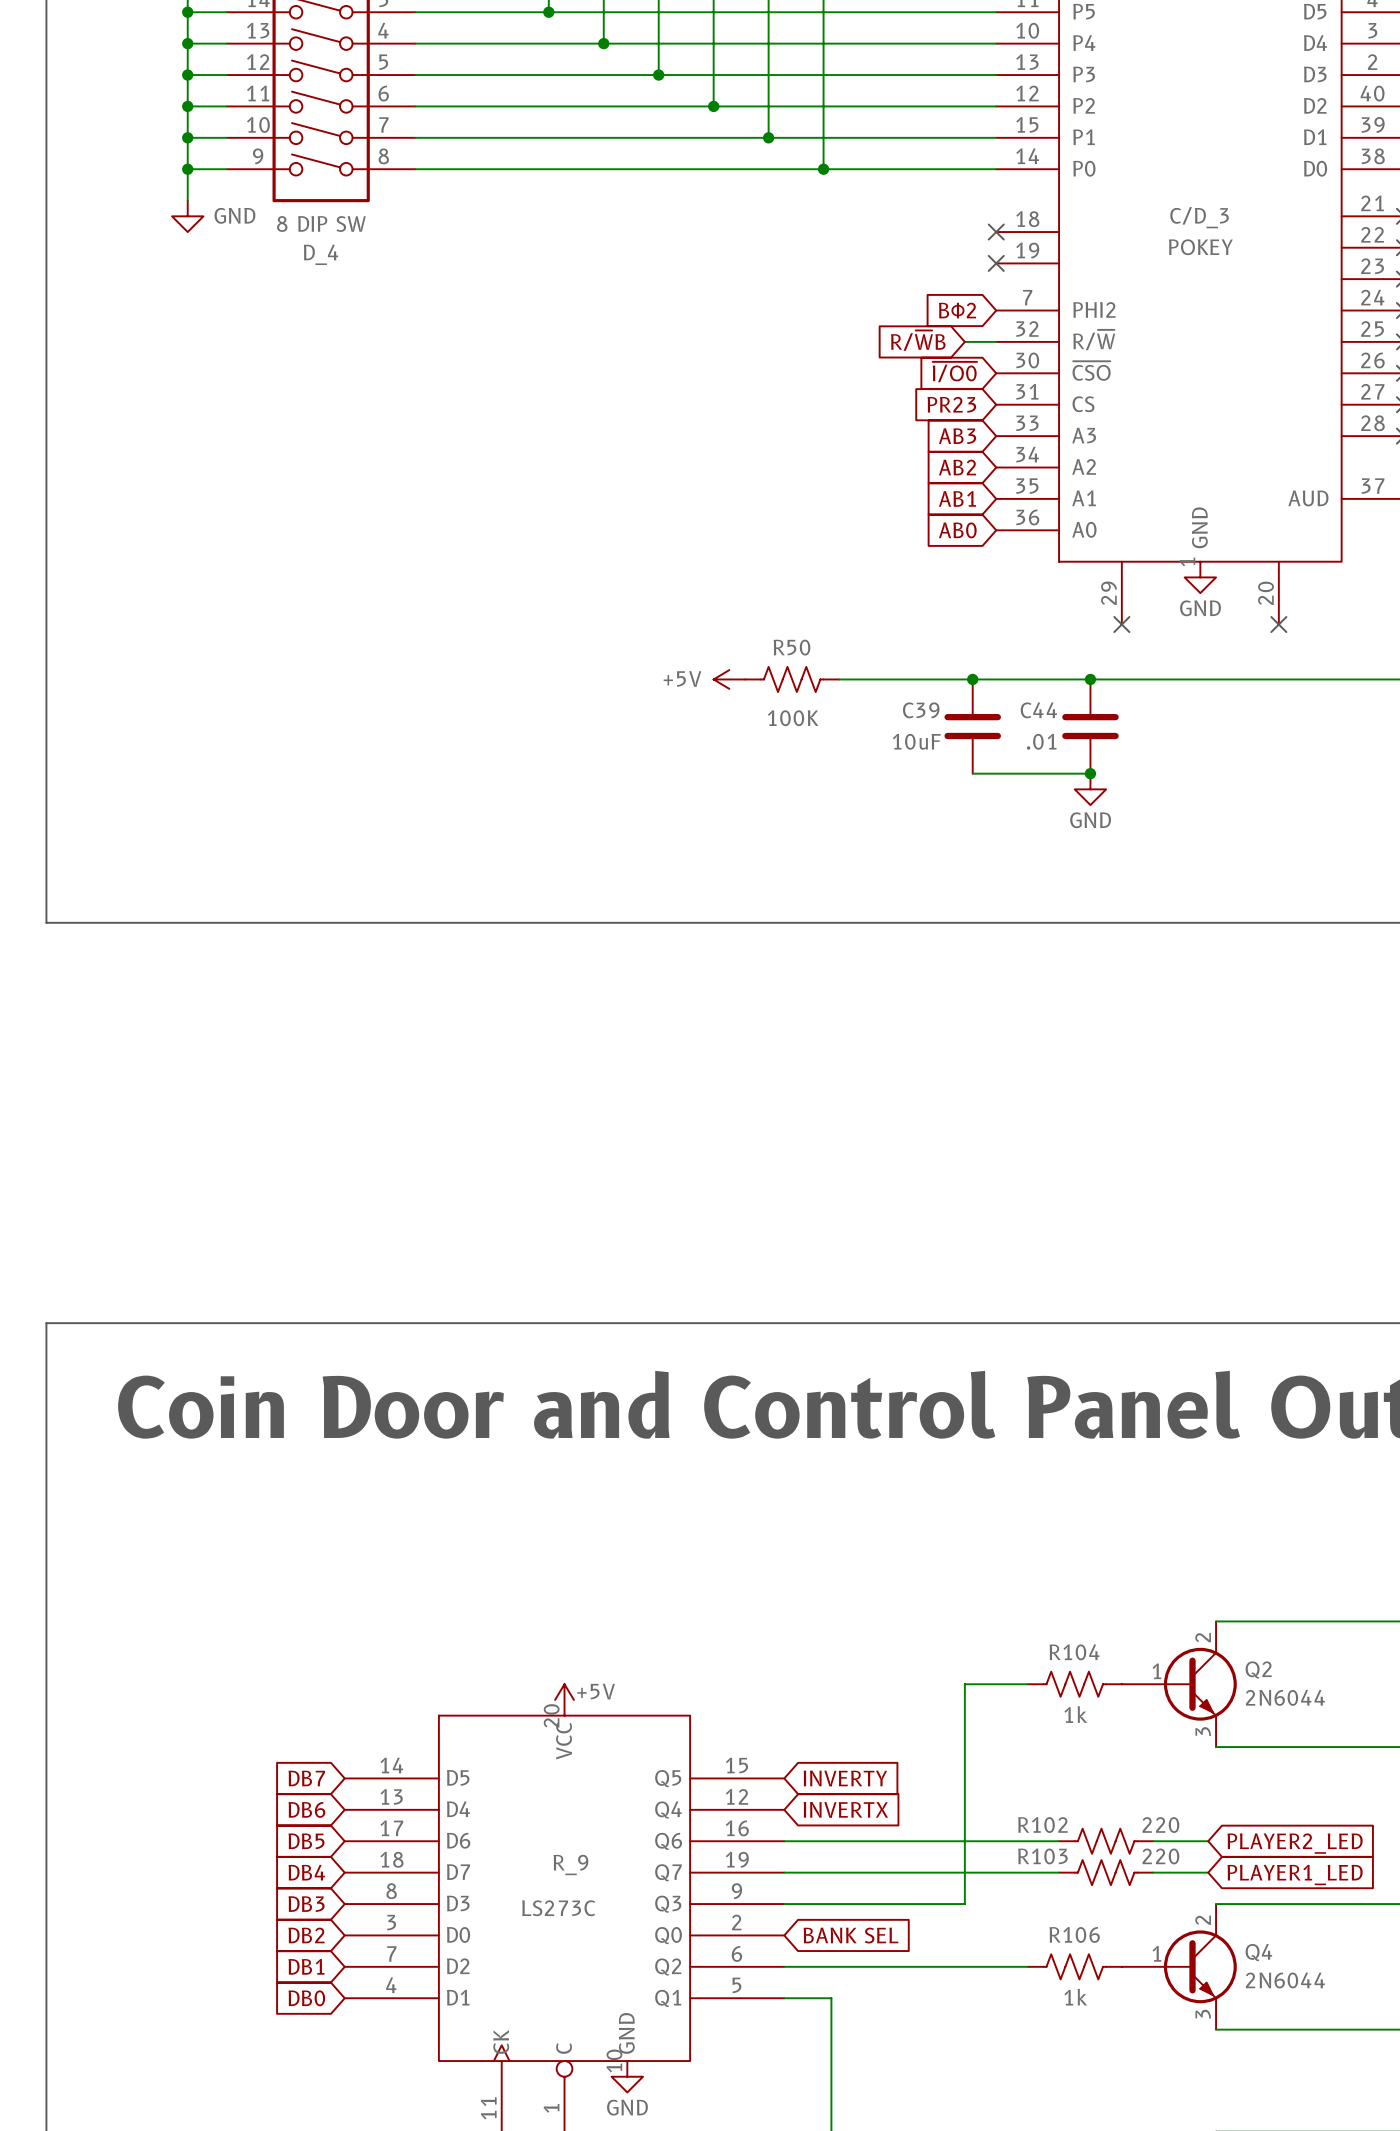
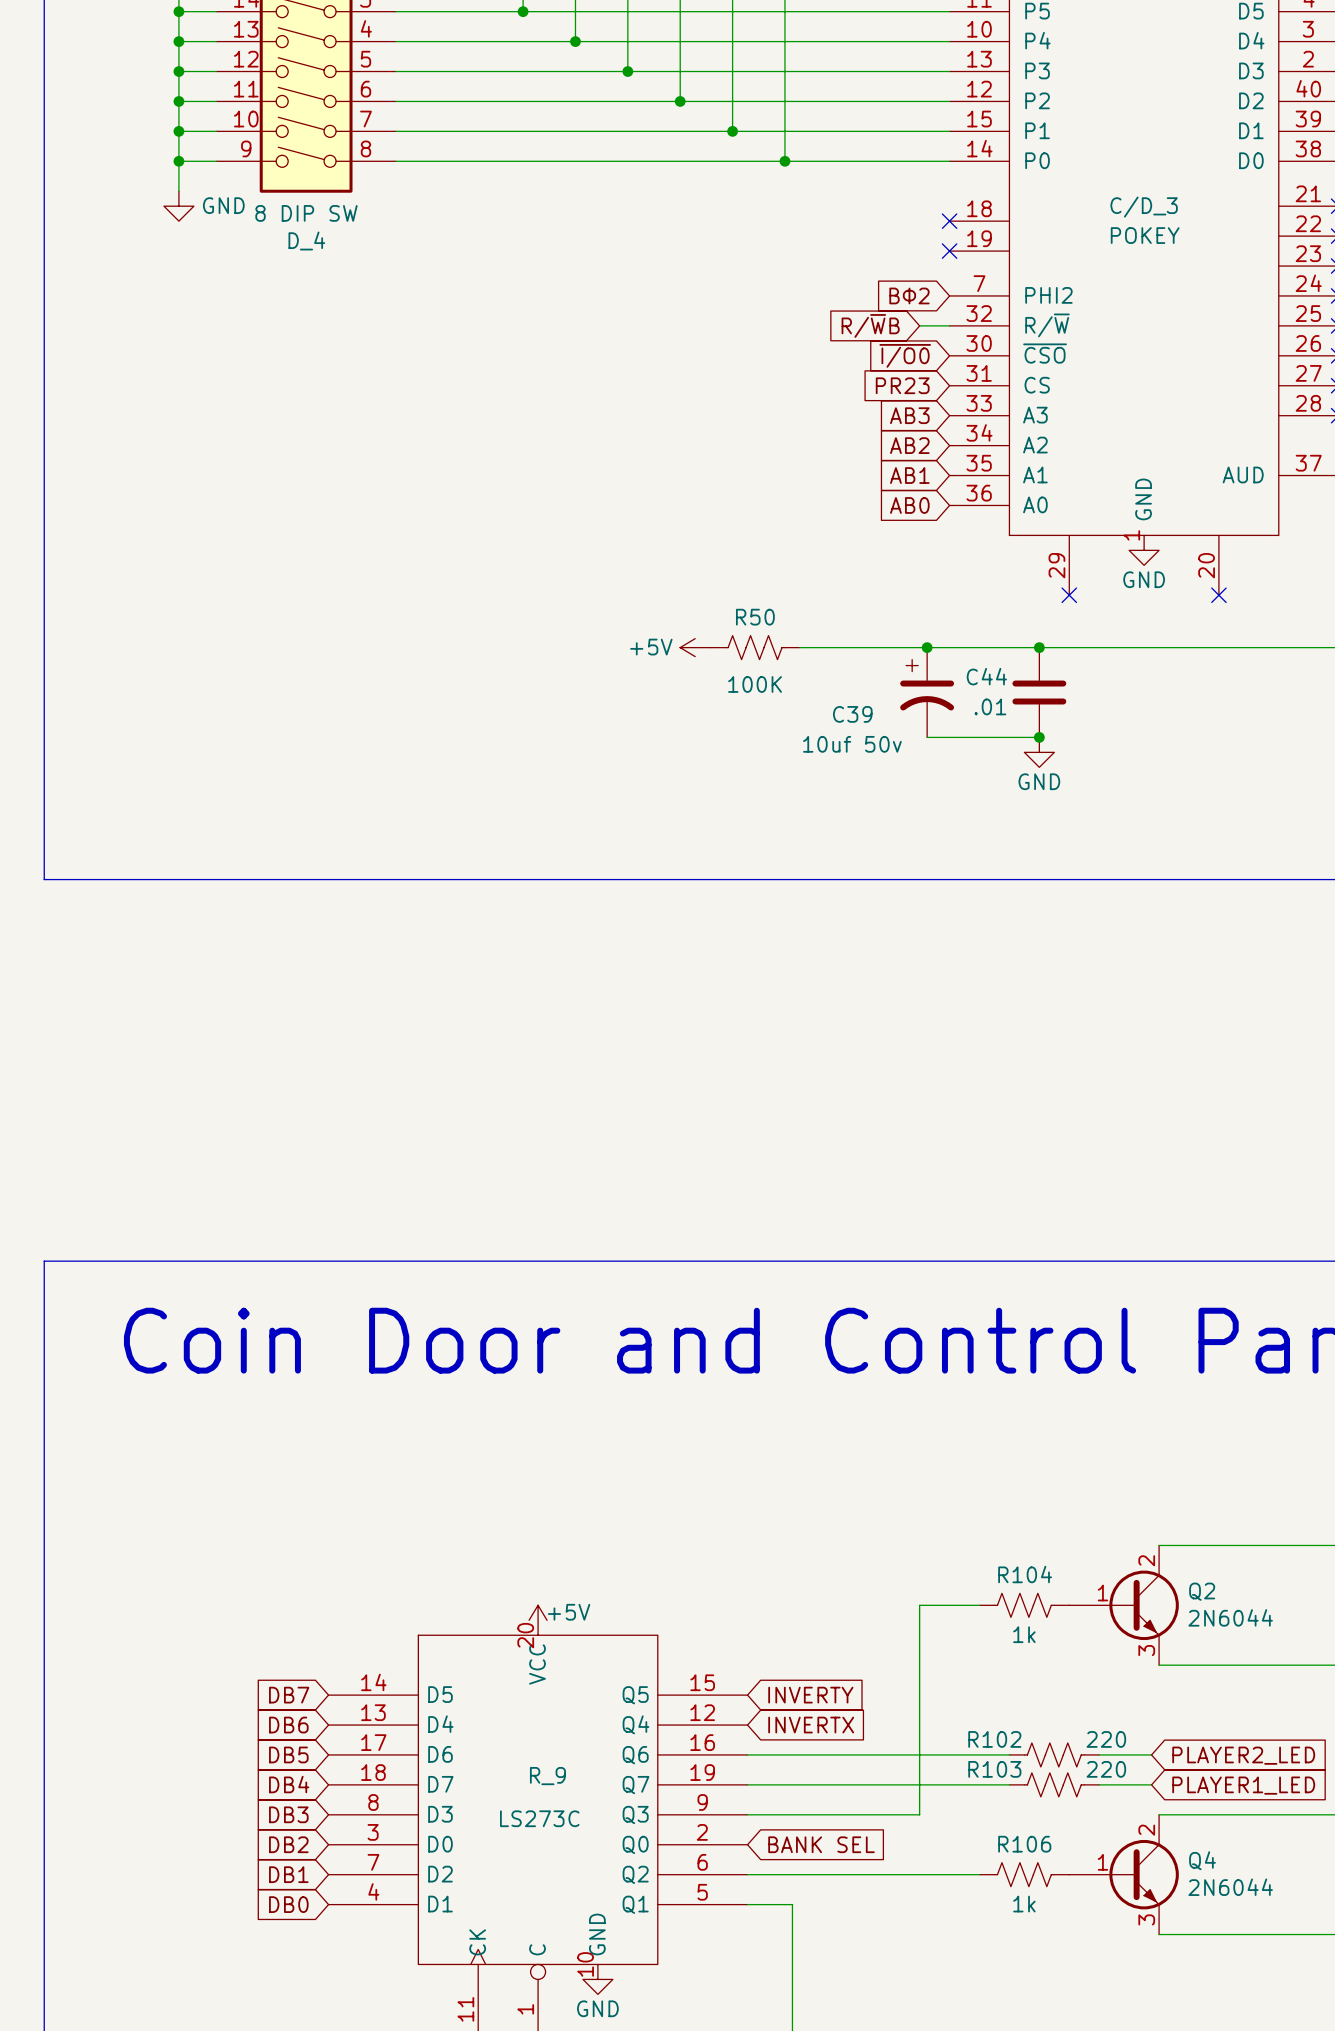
C39 symbol: [944, 679, 1001, 774] -> [900, 647, 955, 738]
C39 name position: C39 (921, 710) -> C39 (852, 714)
C39 value: 10uF (916, 741) -> 10uf 50v (852, 744)

